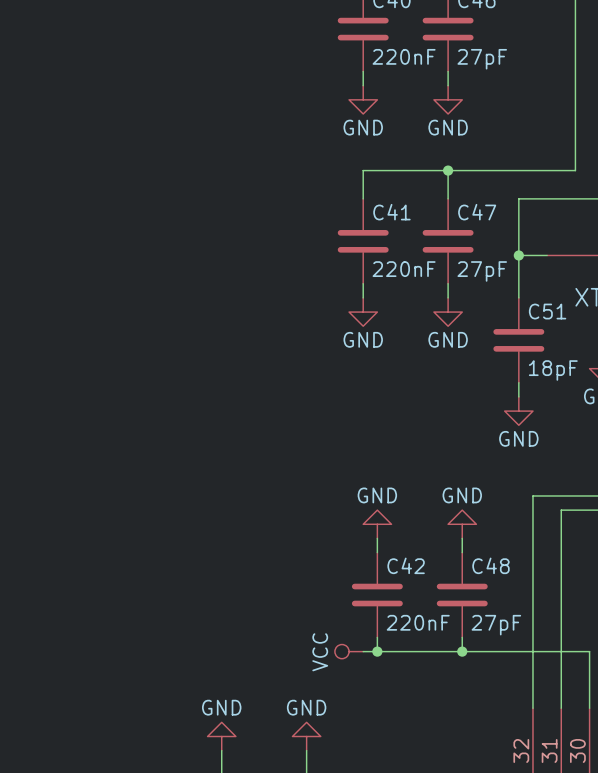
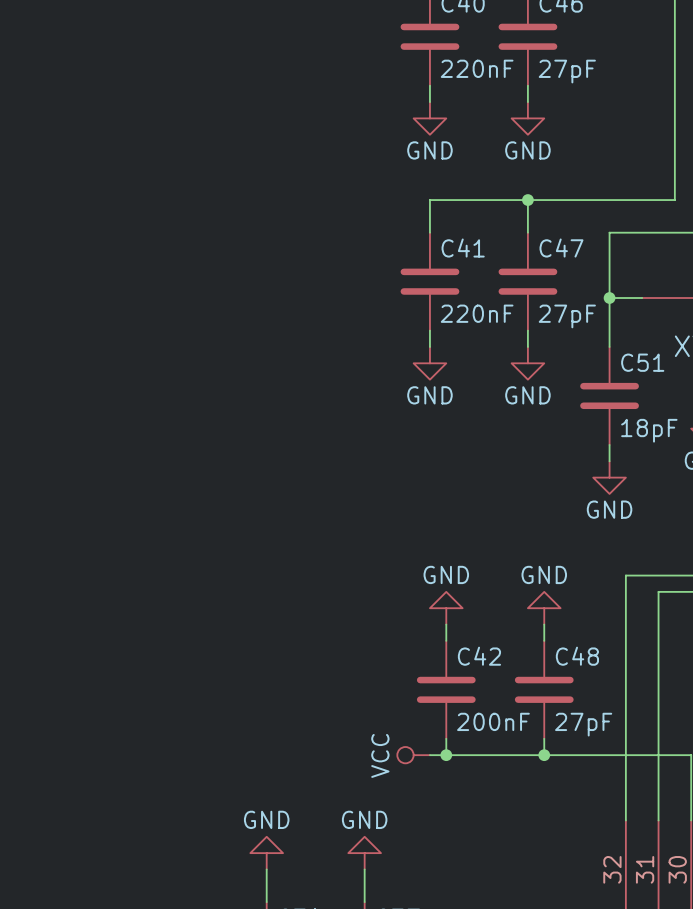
C42 value: 220nF (418, 622) -> 200nF (493, 721)

